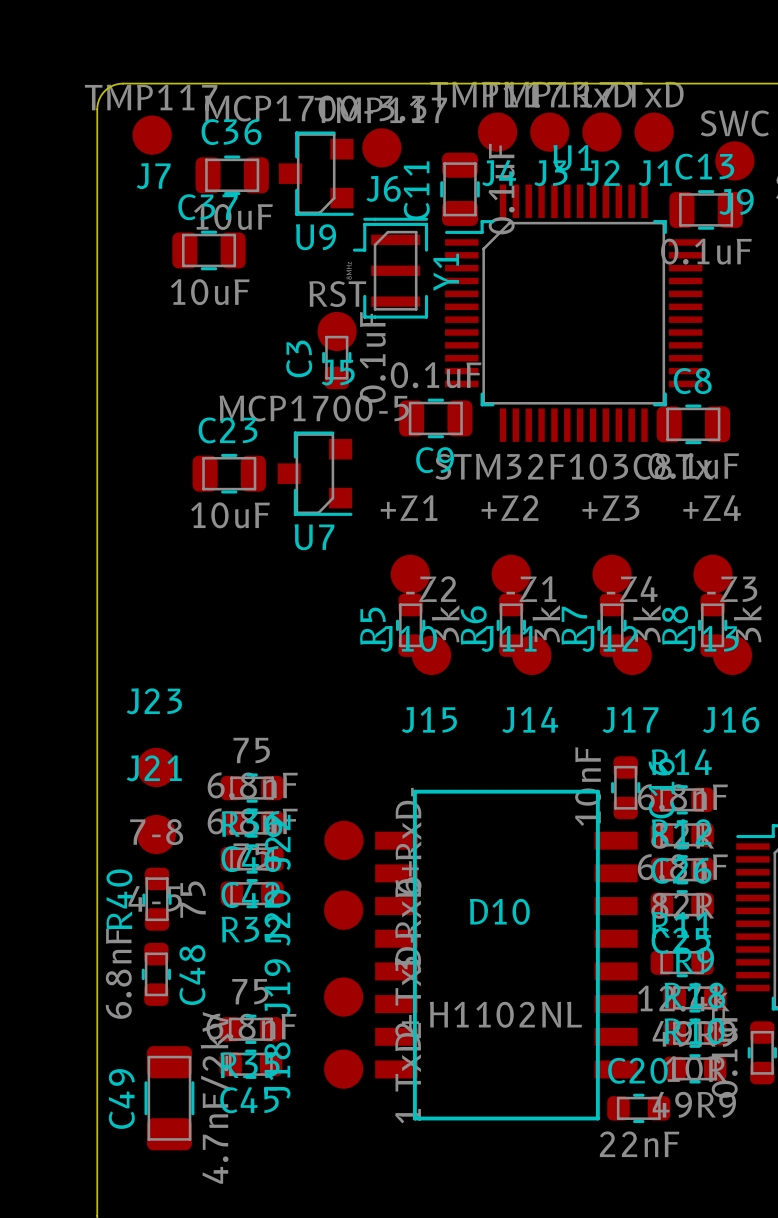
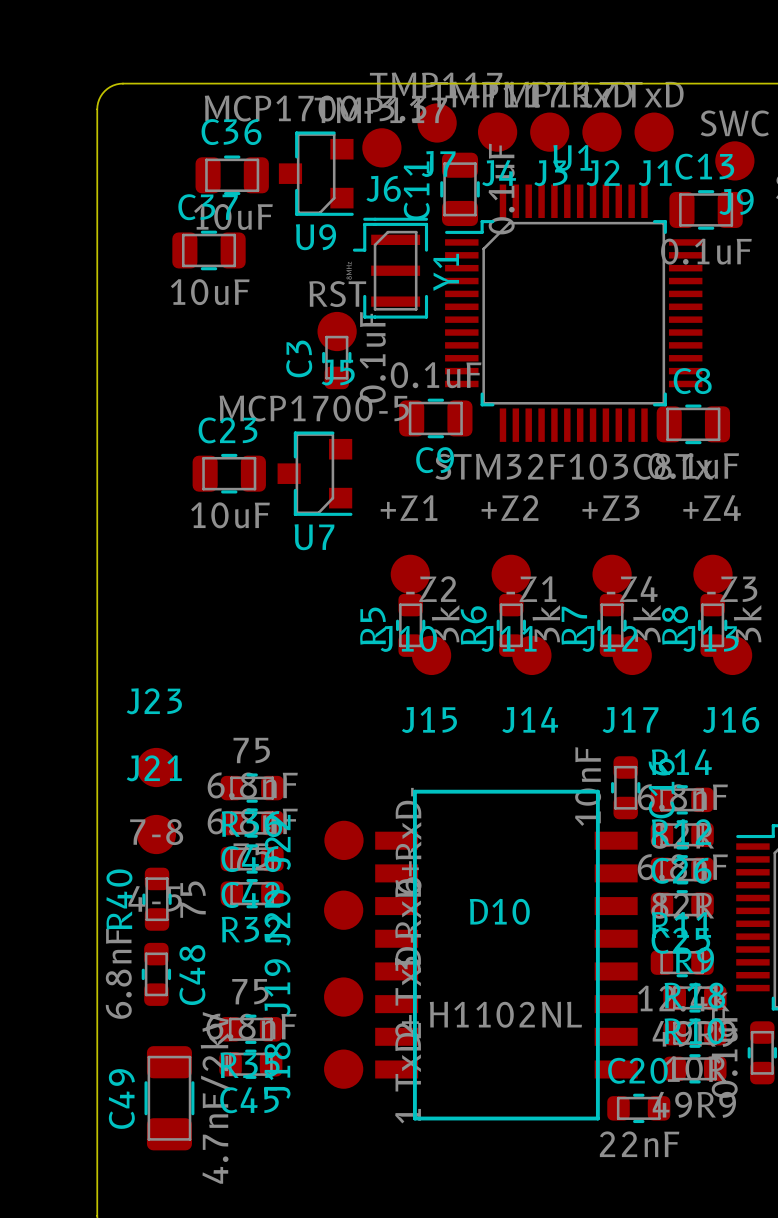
J7 position: (152, 135) -> (437, 123)

